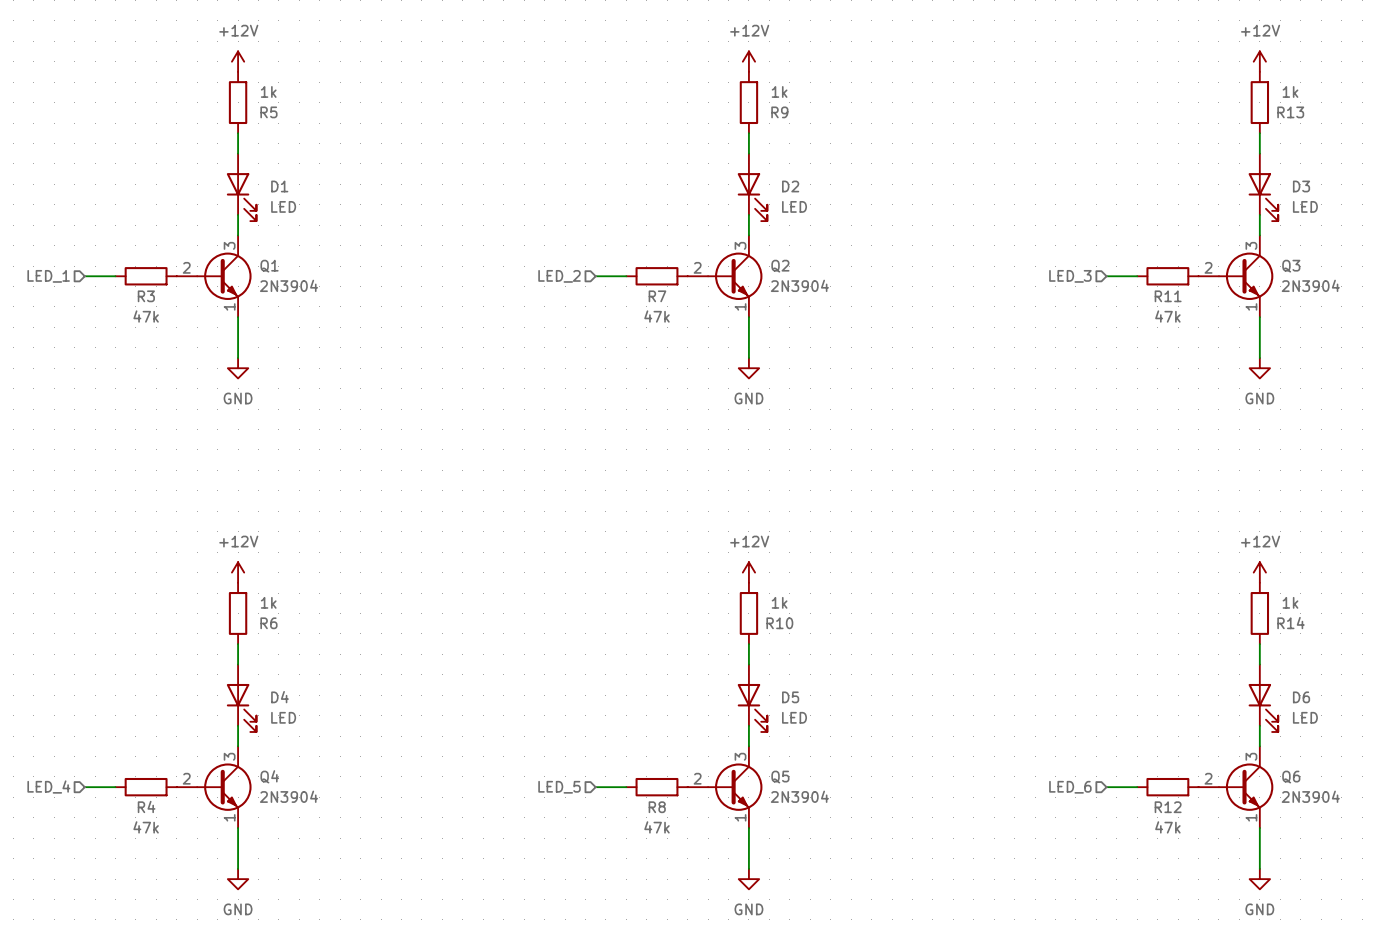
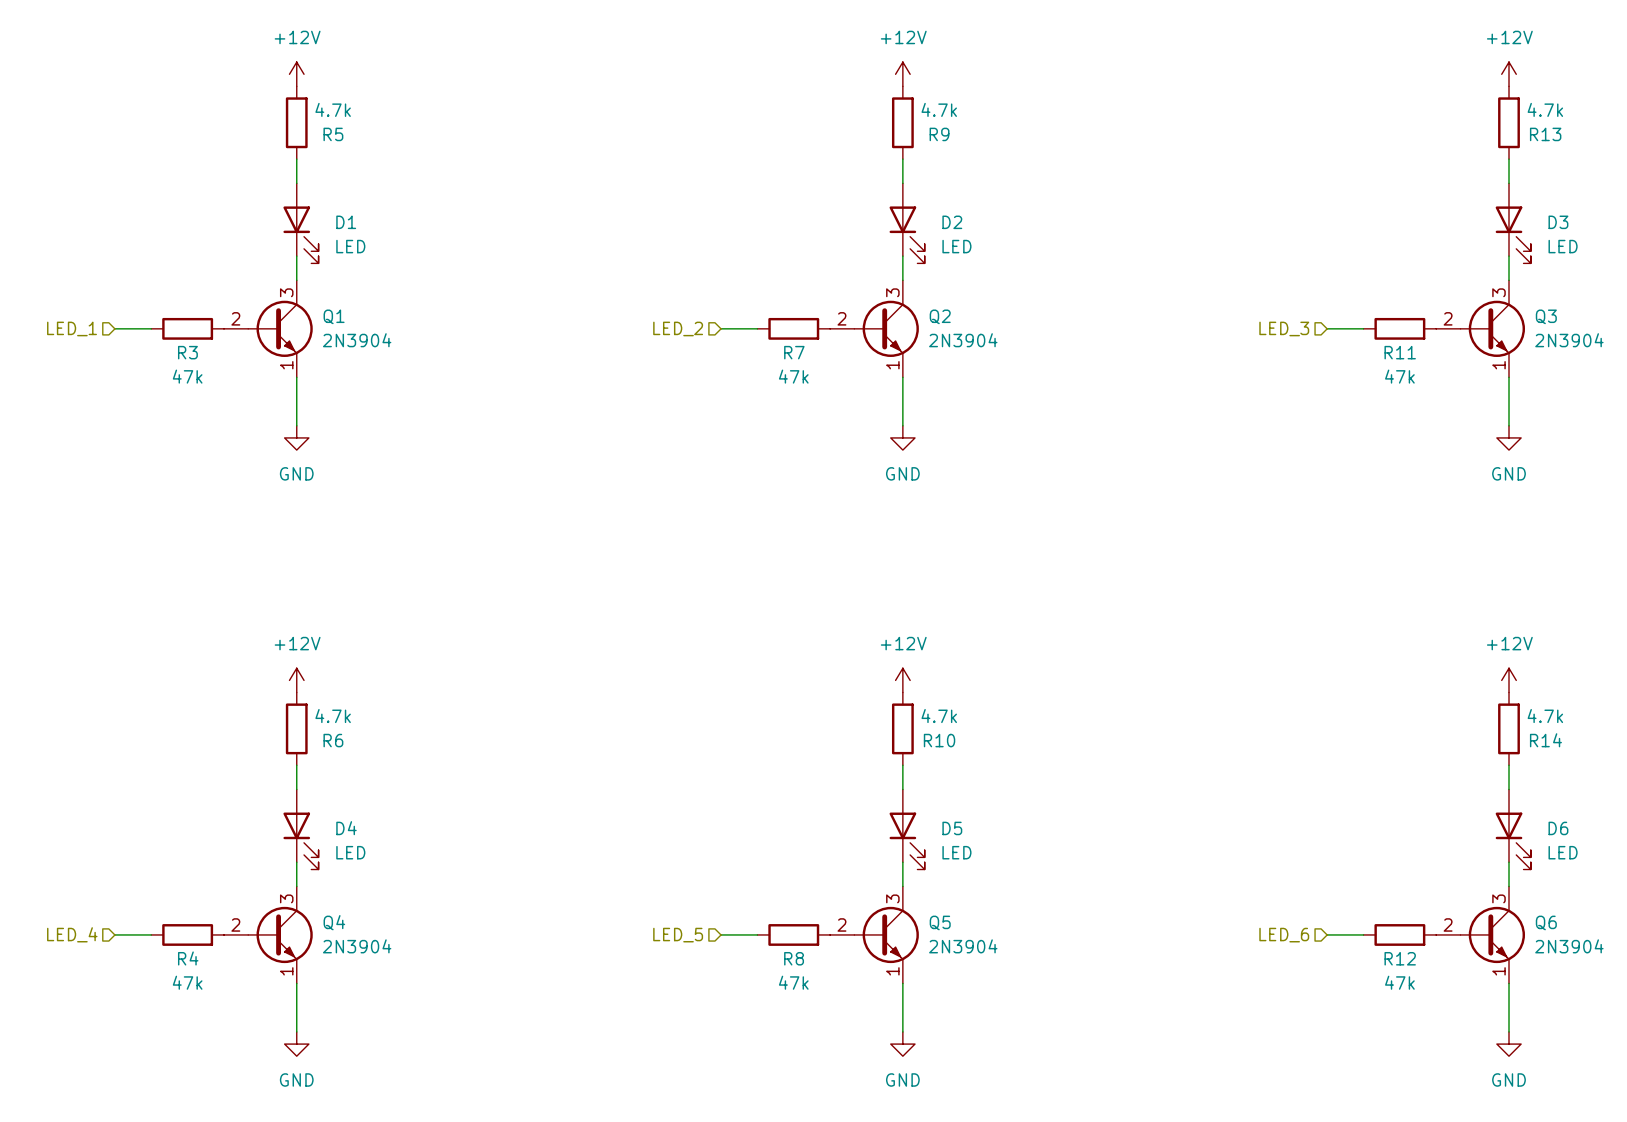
R5 value: 1k (268, 91) -> 4.7k (333, 109)
R9 value: 1k (779, 91) -> 4.7k (939, 109)
R13 value: 1k (1290, 91) -> 4.7k (1545, 109)
R6 value: 1k (268, 602) -> 4.7k (333, 716)
R10 value: 1k (779, 602) -> 4.7k (939, 716)
R14 value: 1k (1290, 602) -> 4.7k (1545, 716)

